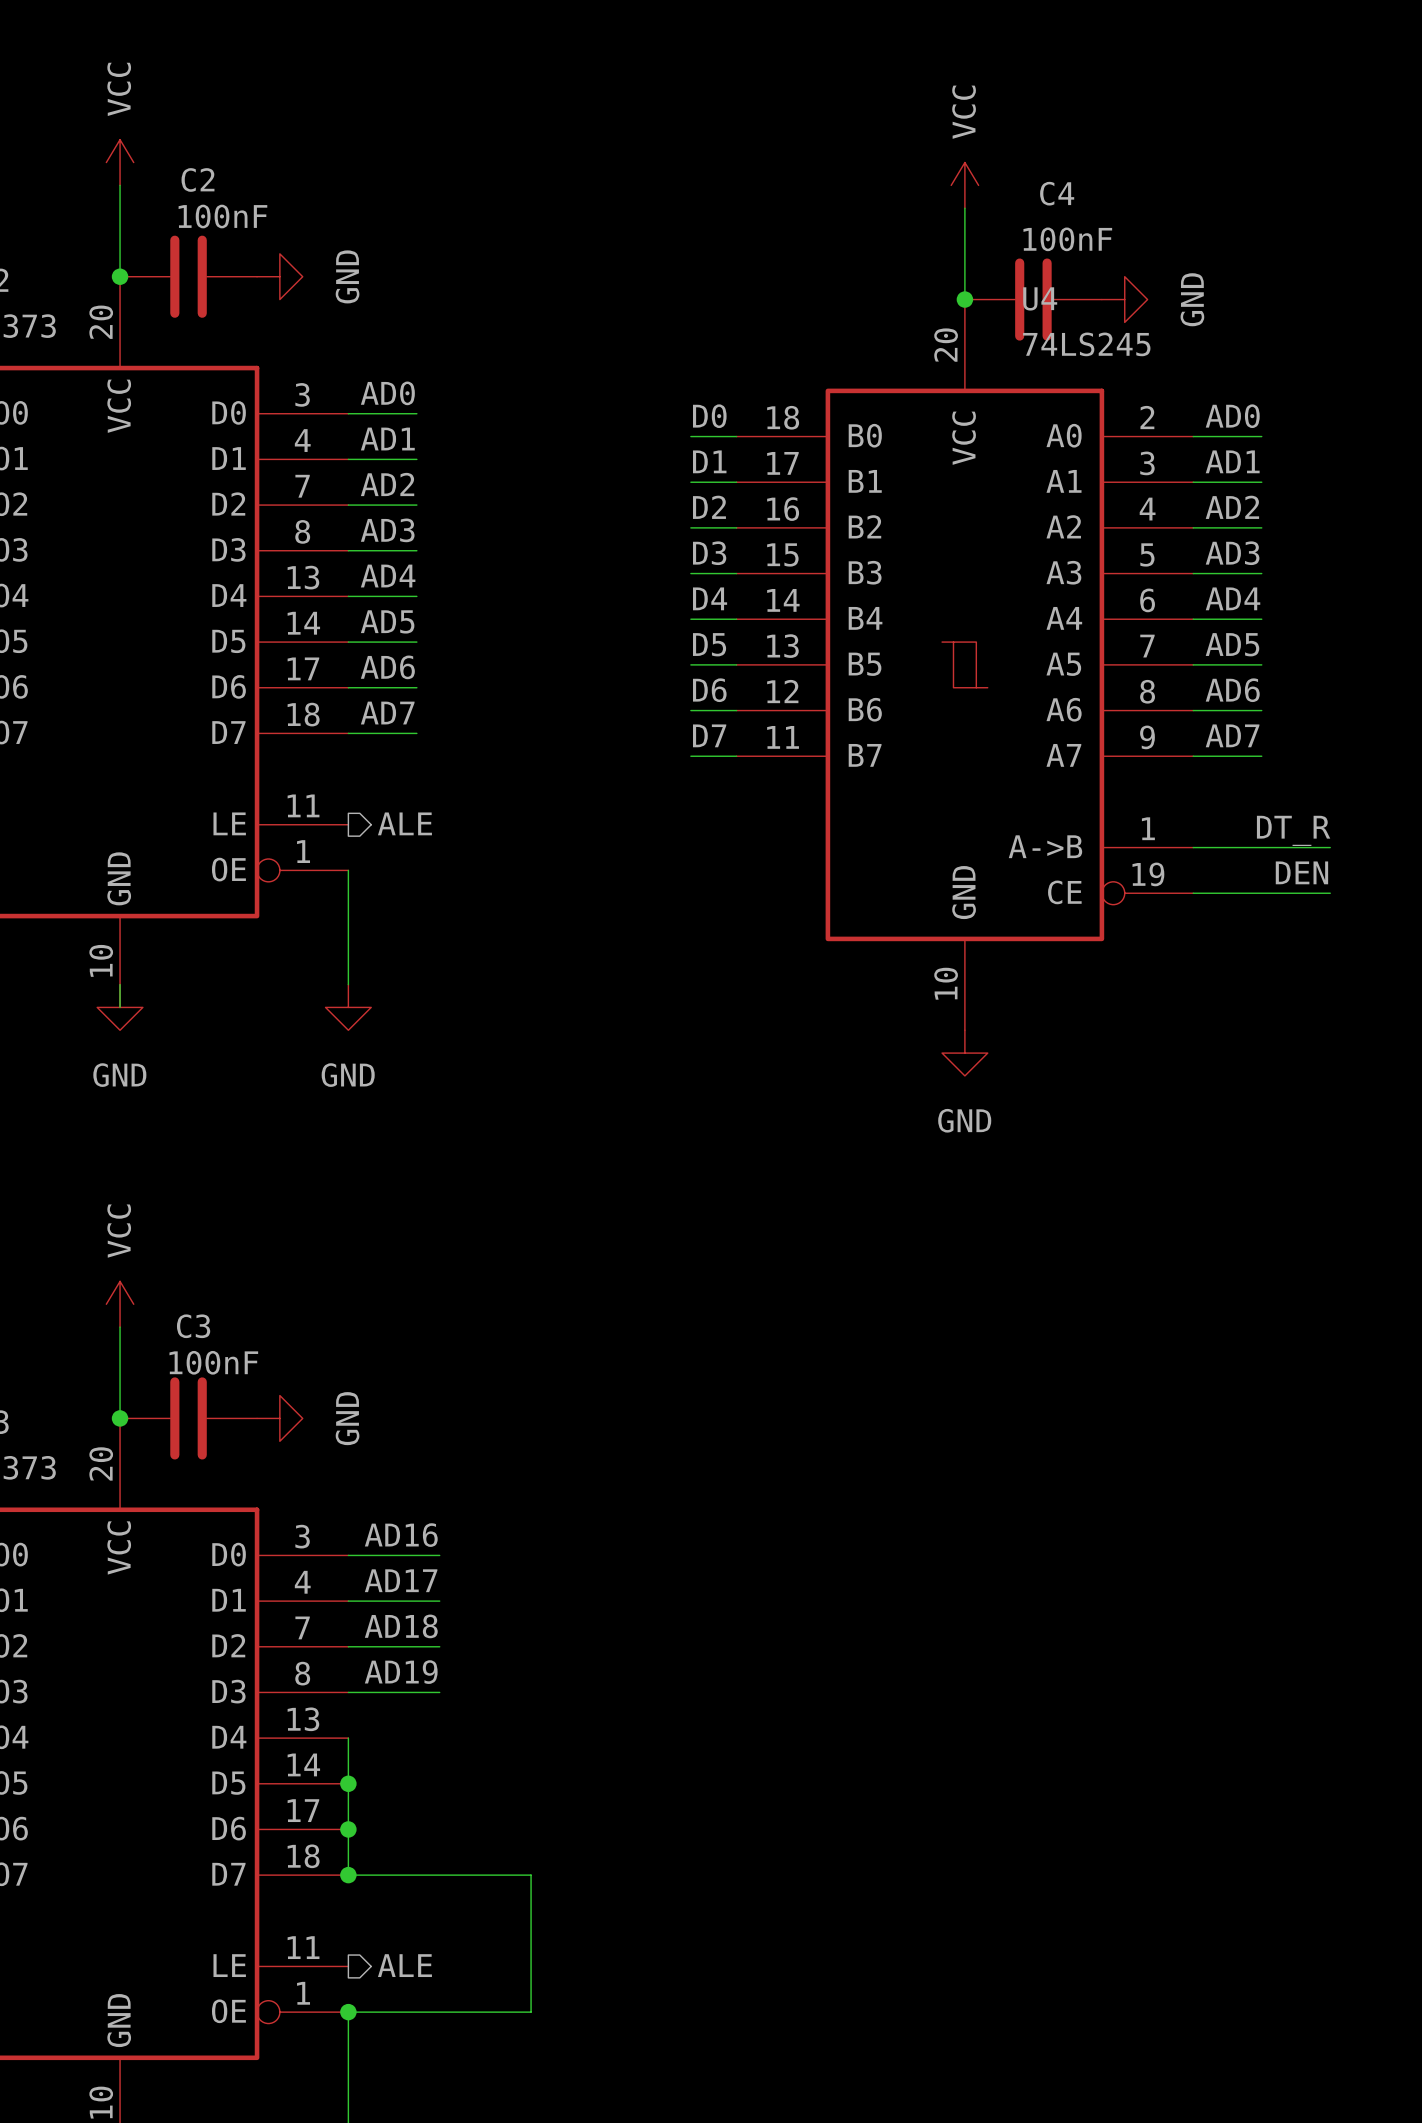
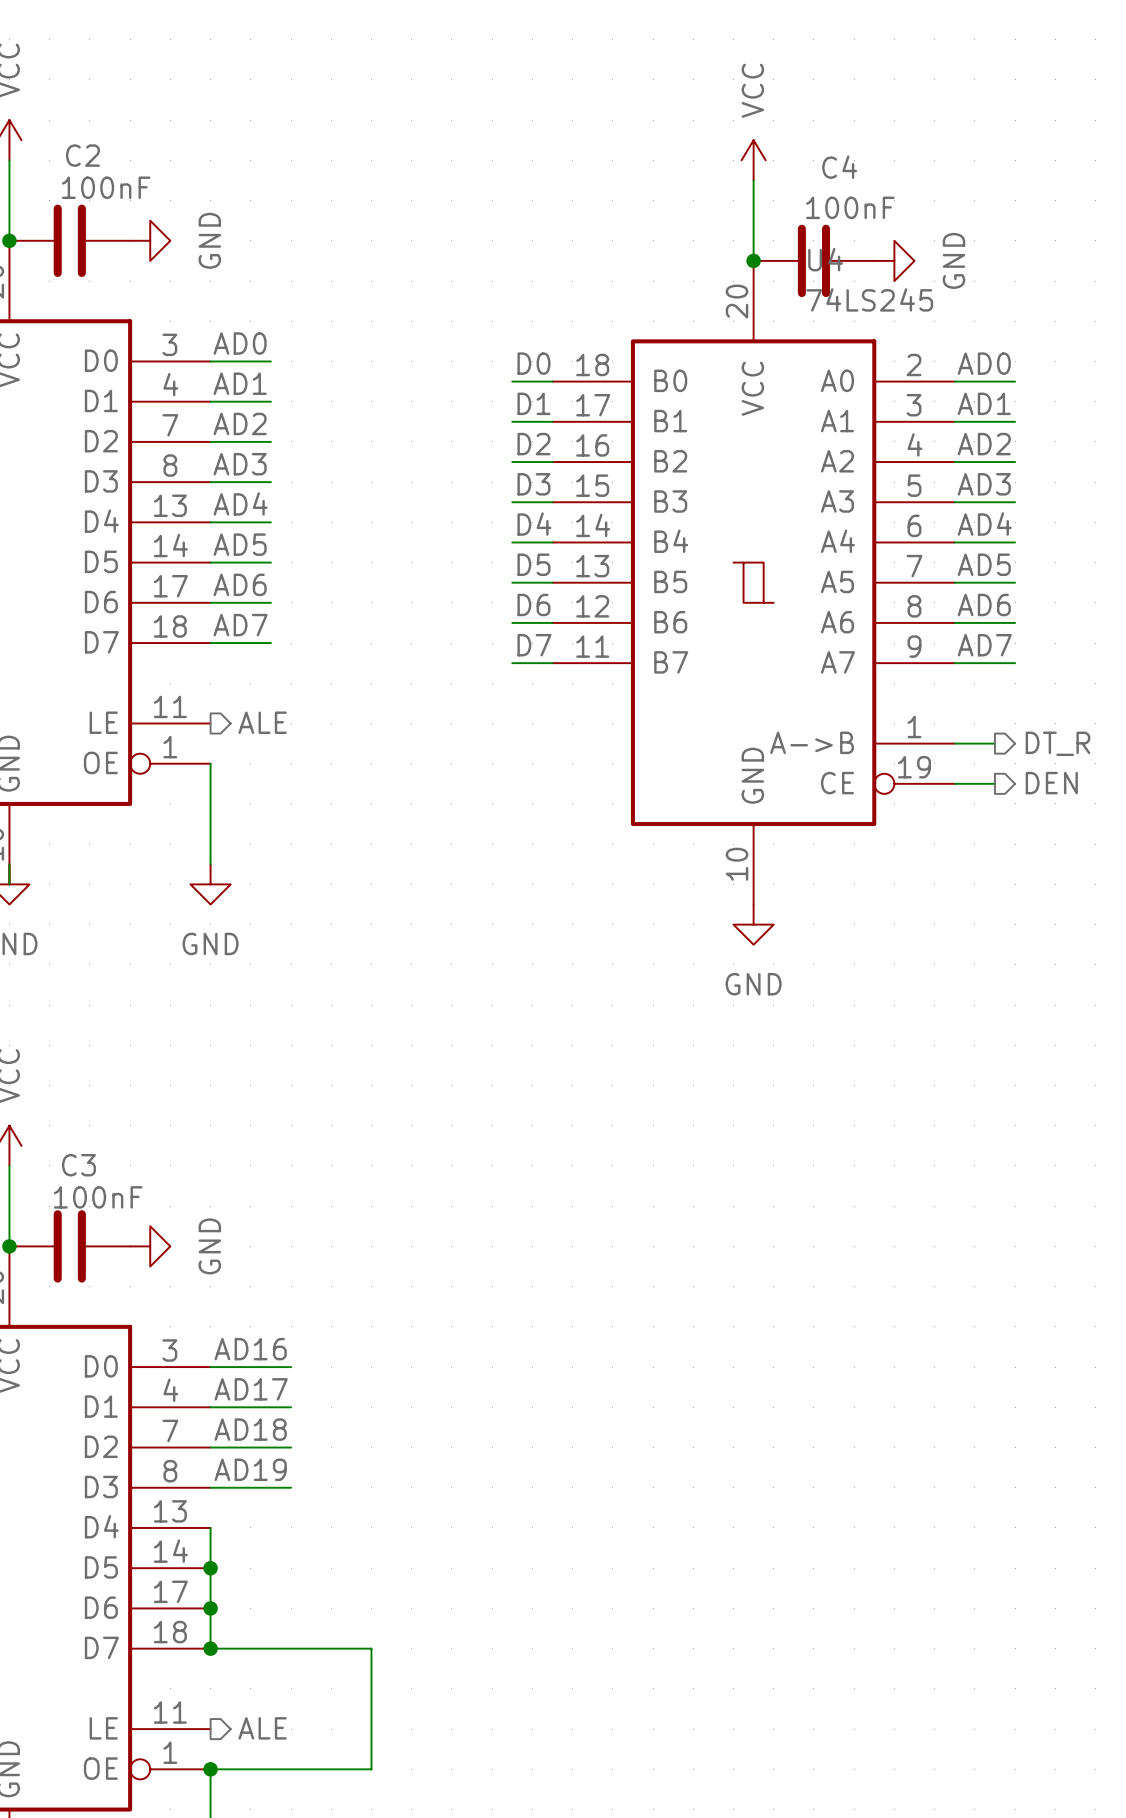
label: DT_R (1293, 830) -> none
wire: (1238, 847) (1330, 847) -> none
hierarchical label: none -> DT_R (1058, 743)
label: DEN (1301, 872) -> none
hierarchical label: none -> DEN (1051, 783)
wire: (1238, 893) (1330, 893) -> none

